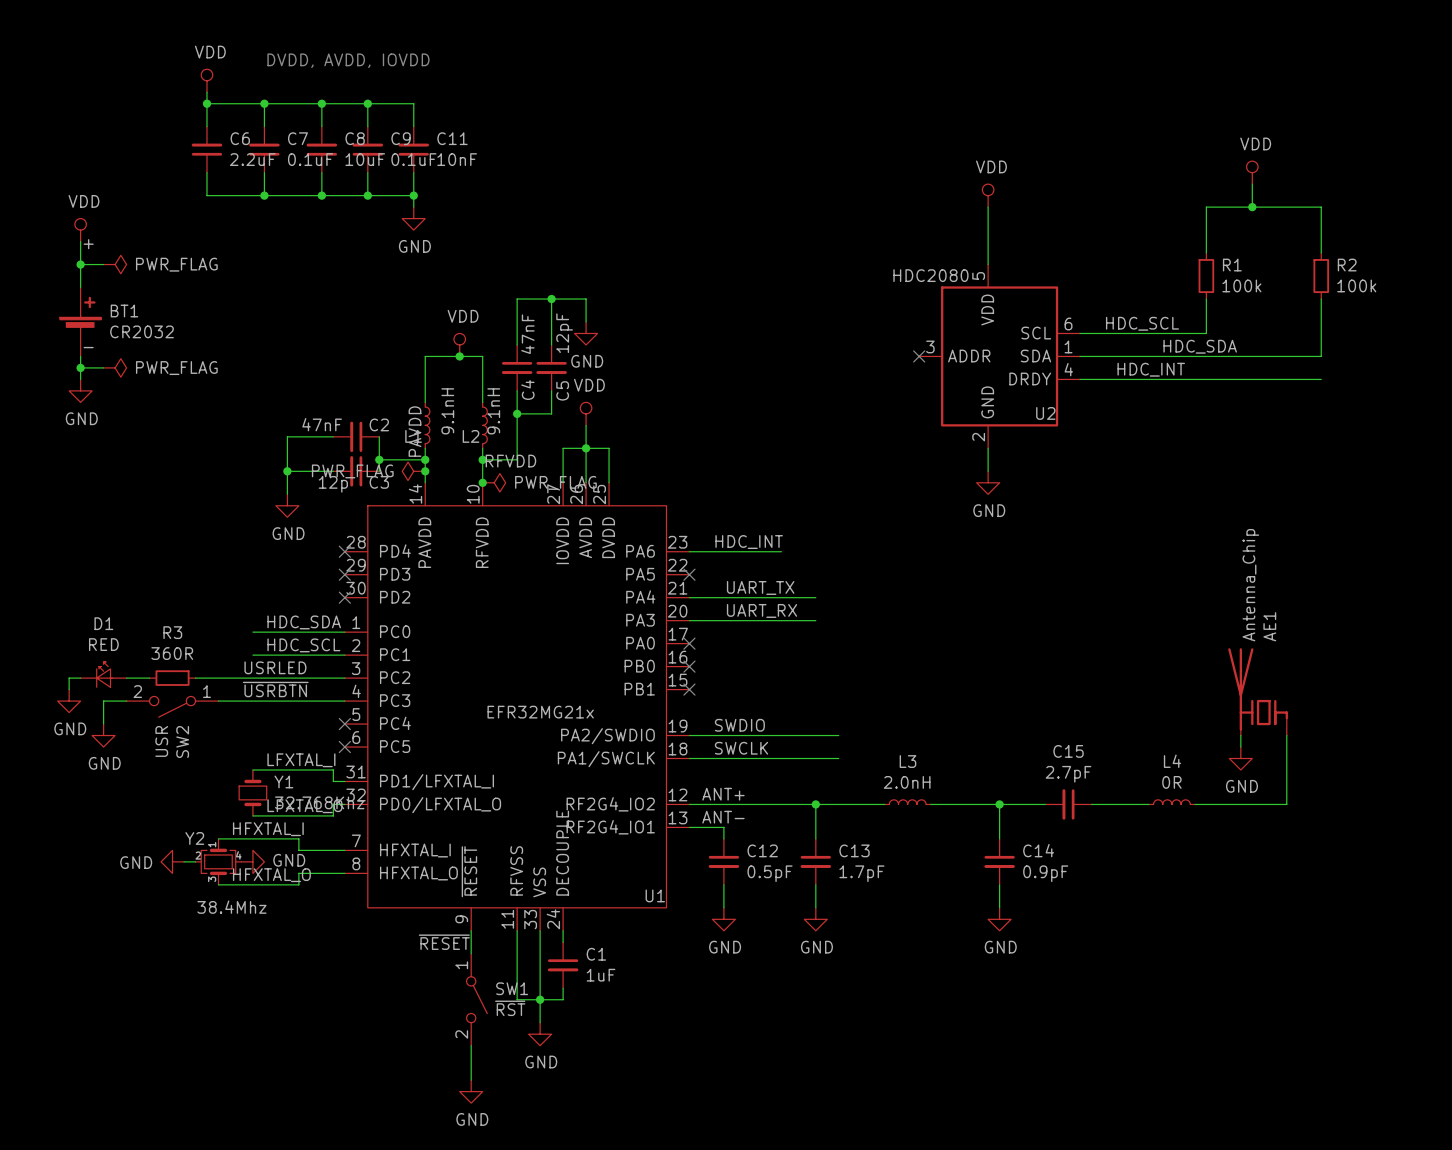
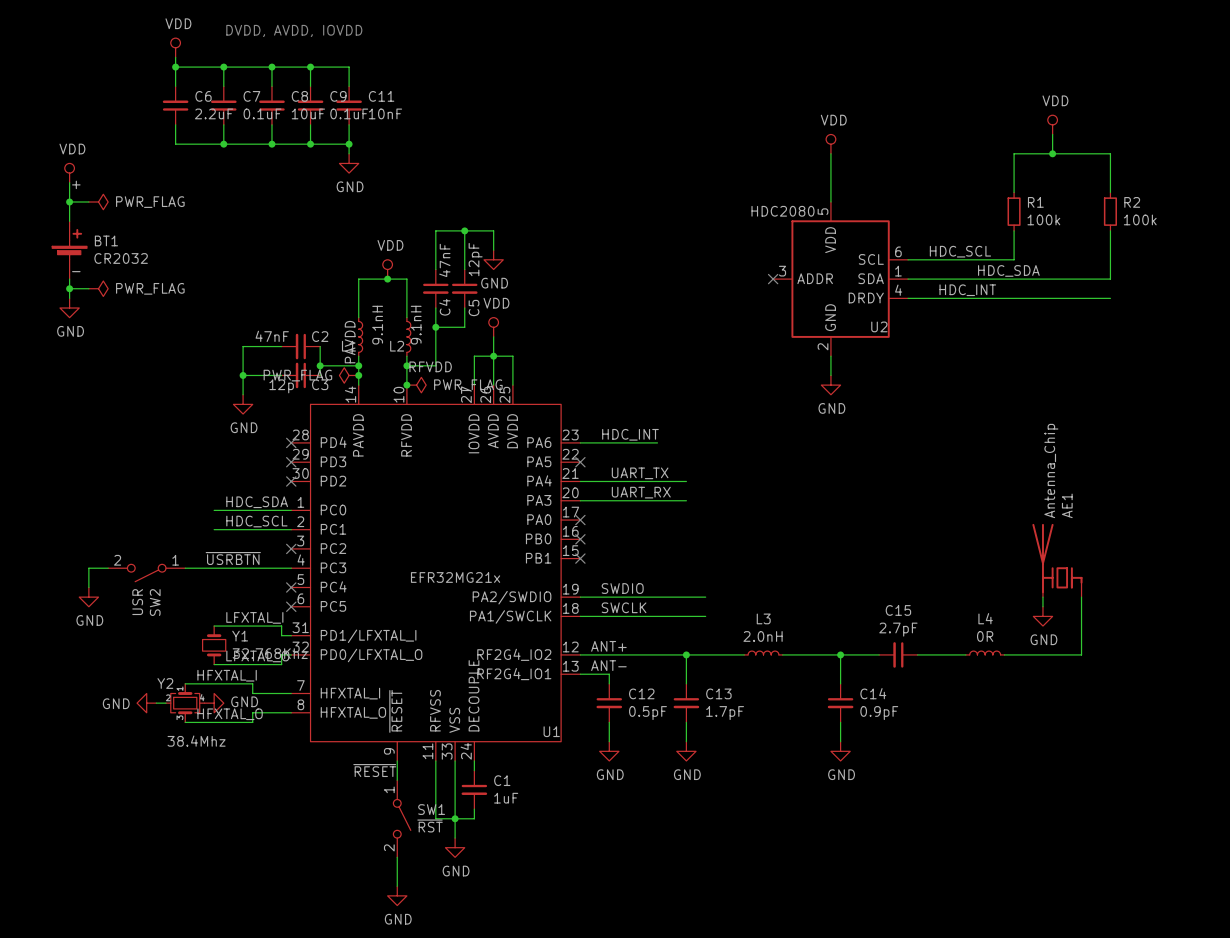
label: USRLED (275, 667) -> none
D1: RED (103, 674) -> none
wire: (80, 678) (69, 678) (69, 689) -> none
wire: (126, 678) (149, 678) -> none
R3: 360R (172, 678) -> none
wire: (195, 678) (344, 678) -> none
no-connect mark: none -> (291, 548)
power symbol: GND (69, 701) -> none

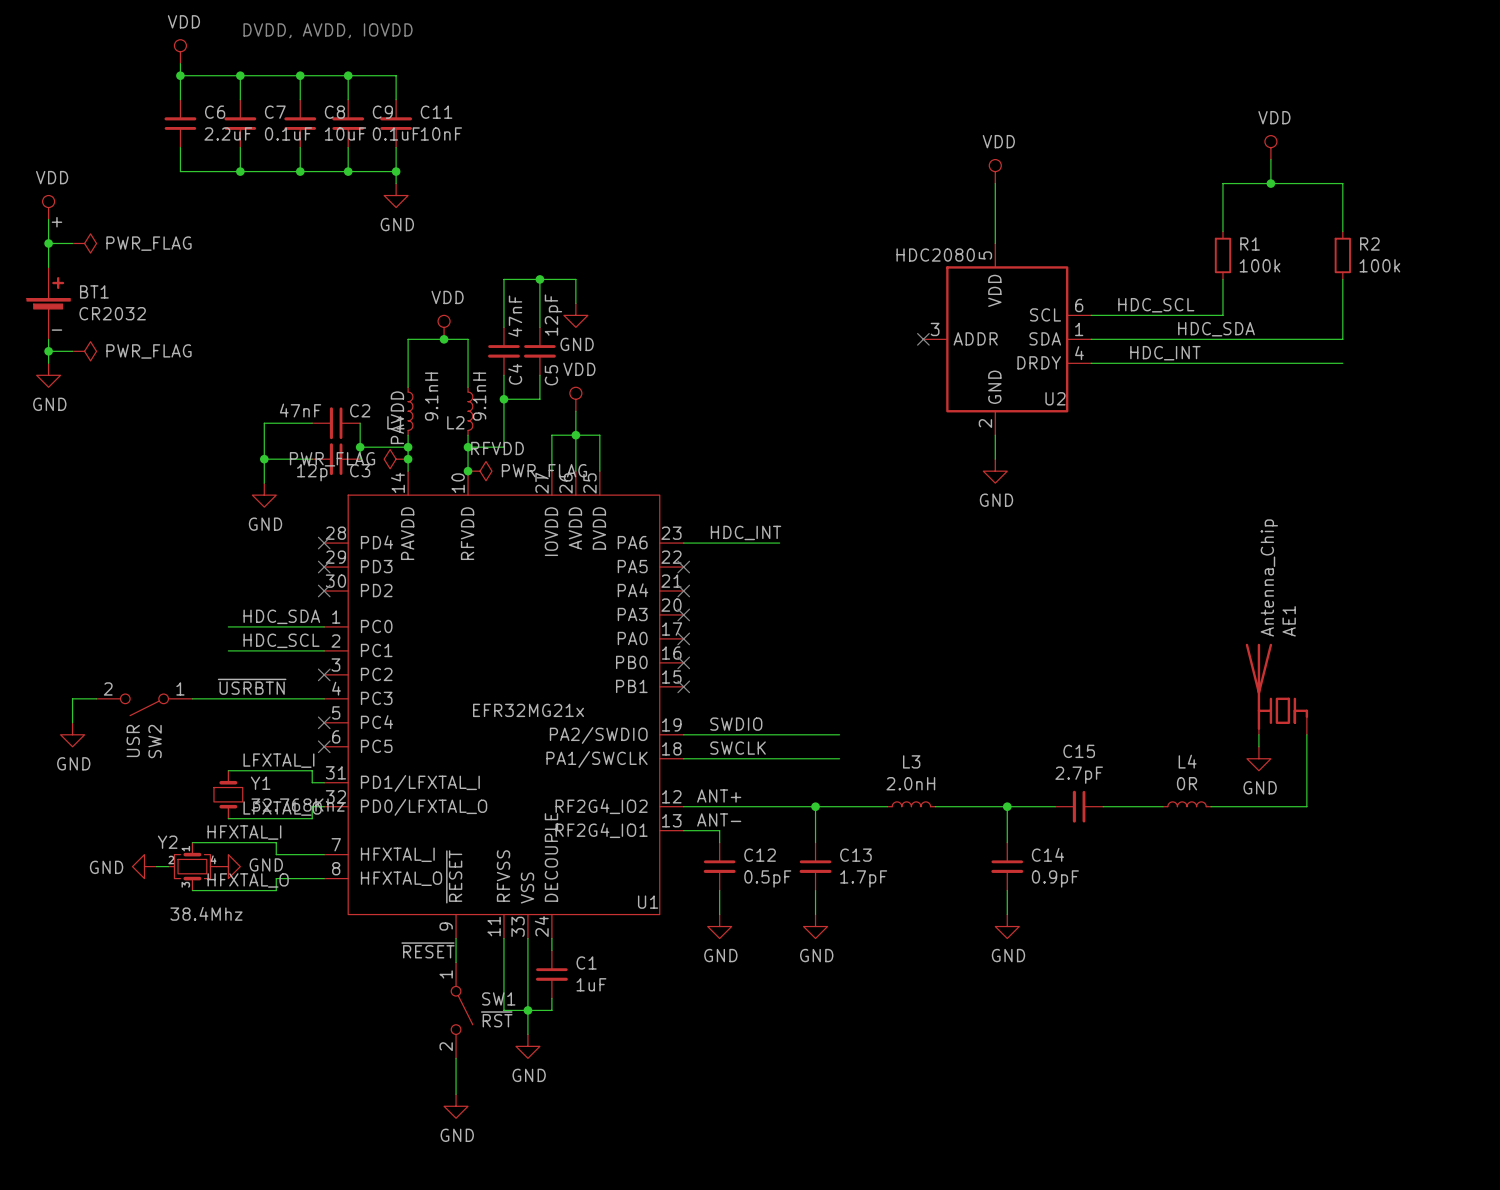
label: UART_TX (640, 473) -> none
wire: (580, 481) (686, 481) -> none
no-connect mark: none -> (683, 590)
label: UART_RX (641, 492) -> none
wire: (580, 500) (686, 500) -> none
no-connect mark: none -> (683, 614)

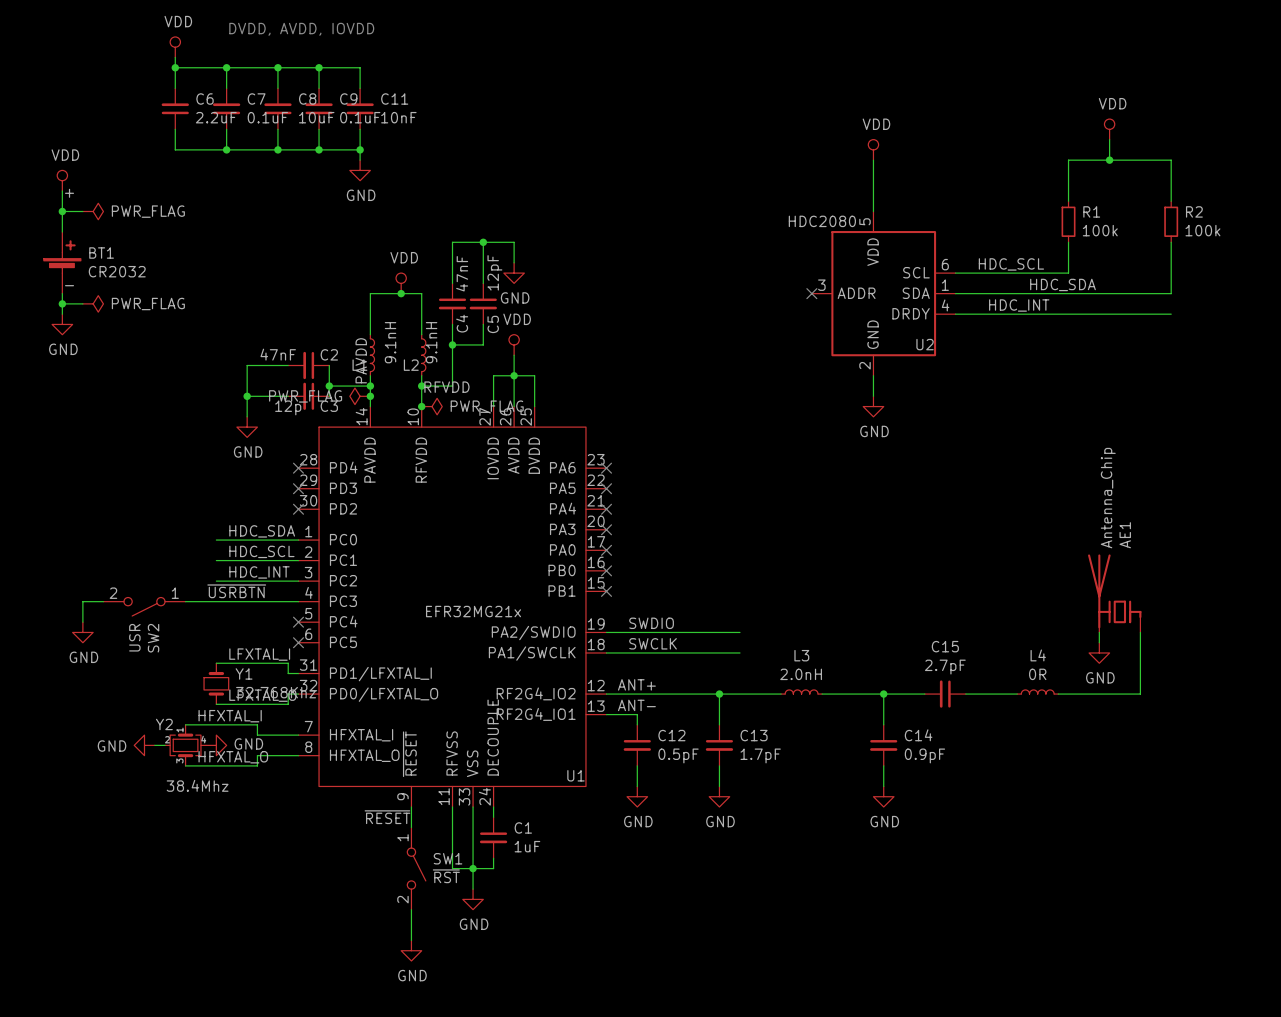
label: HDC_INT (746, 532) -> none
wire: (683, 543) (779, 543) -> none
no-connect mark: none -> (606, 468)
label: none -> HDC_INT (259, 572)
wire: none -> (216, 581) (298, 581)
no-connect mark: (324, 674) -> none

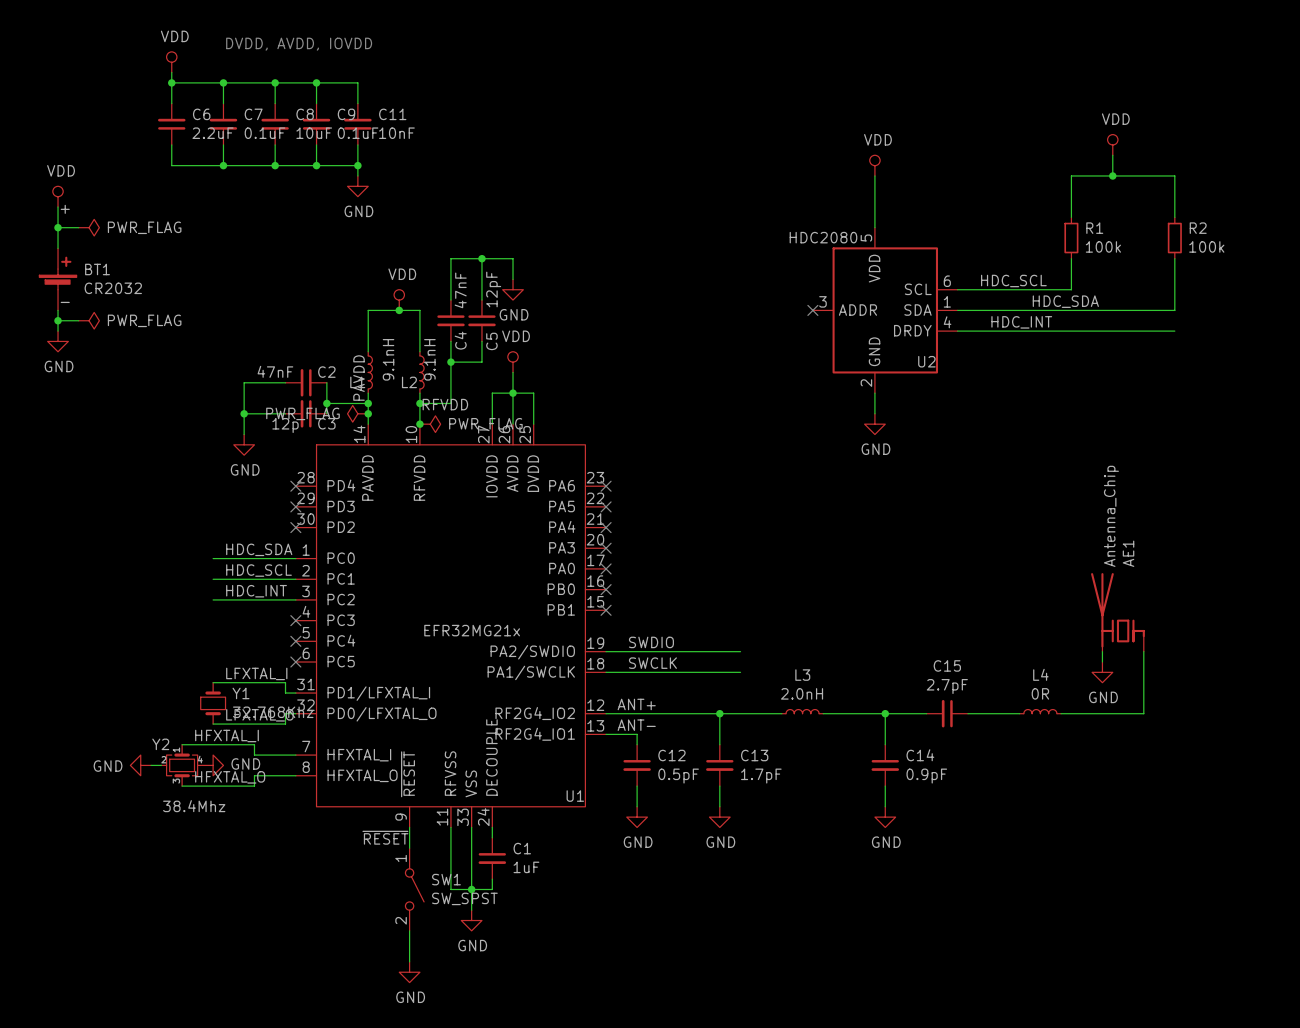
label: ~{USRBTN} (236, 591) -> none
wire: (103, 601) (82, 601) (82, 622) -> none
wire: (185, 601) (298, 601) -> none
no-connect mark: none -> (295, 620)
SW2: USR (144, 606) -> none
power symbol: GND (82, 632) -> none
SW1 value: ~{RST} (446, 876) -> SW_SPST (464, 898)

